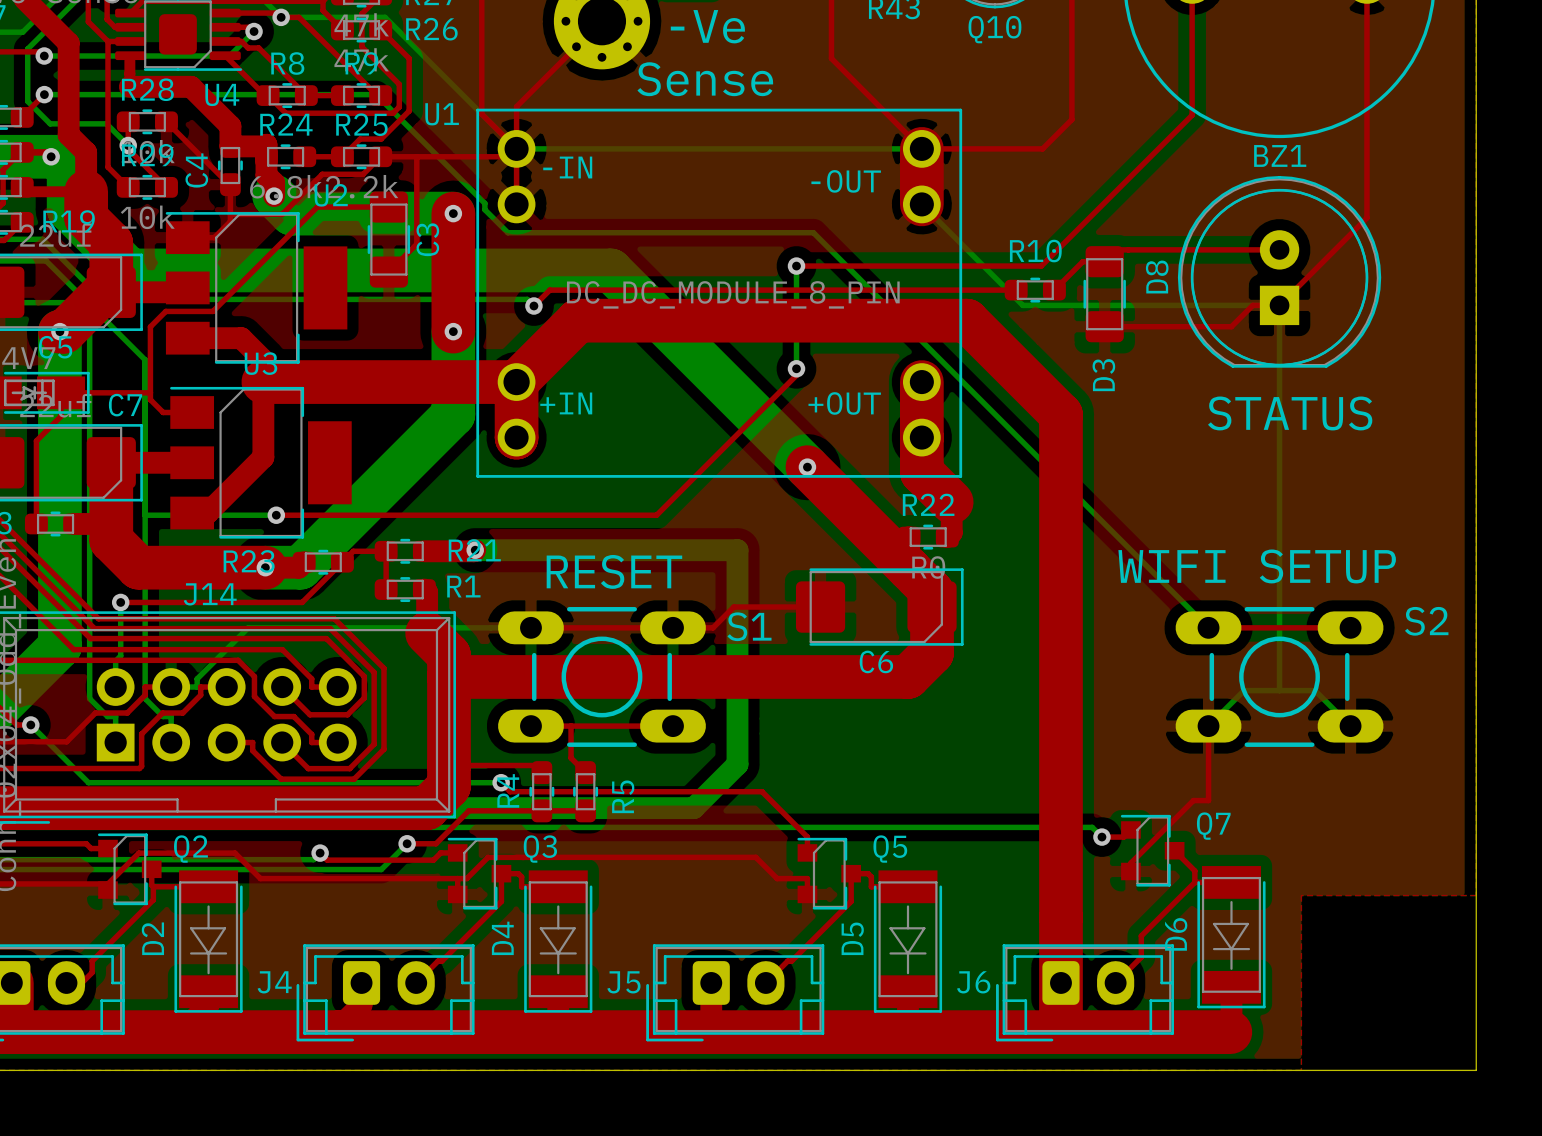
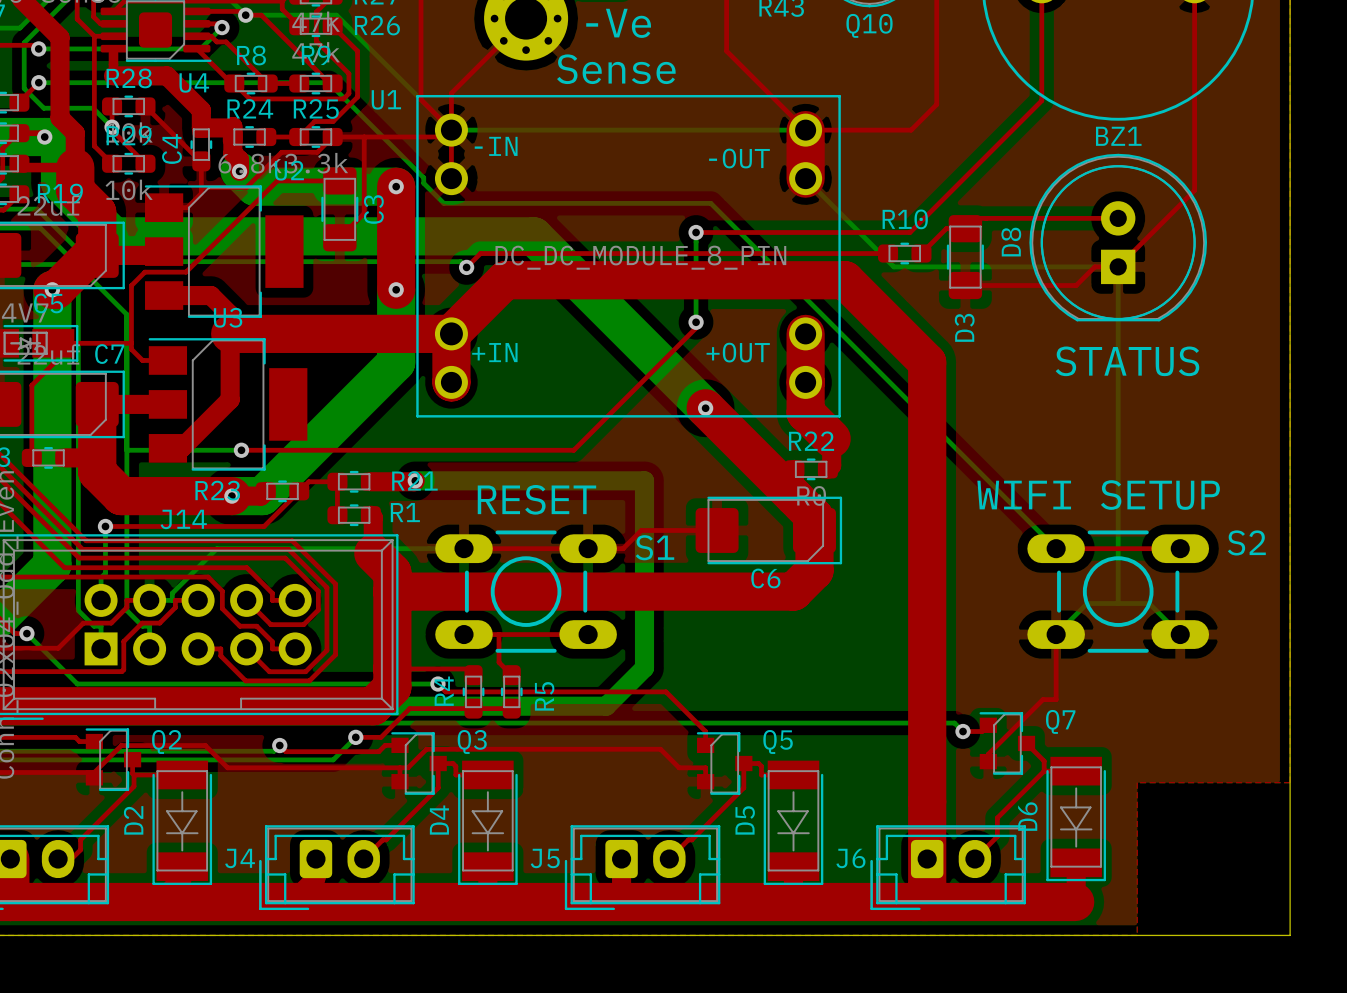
R25 value: 2.2k (362, 186) -> 3.3k (316, 163)

